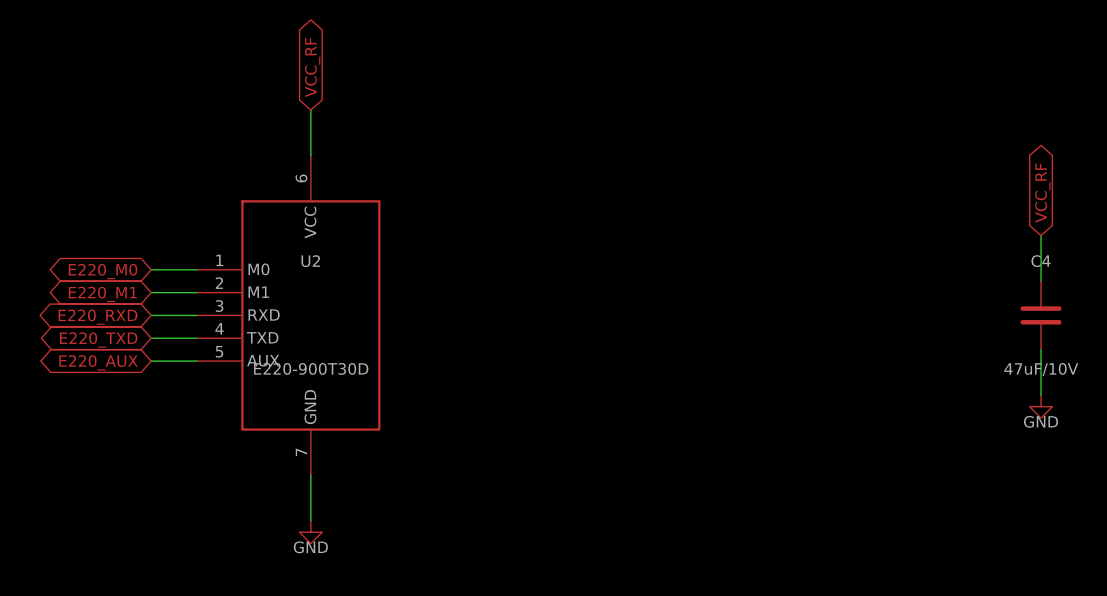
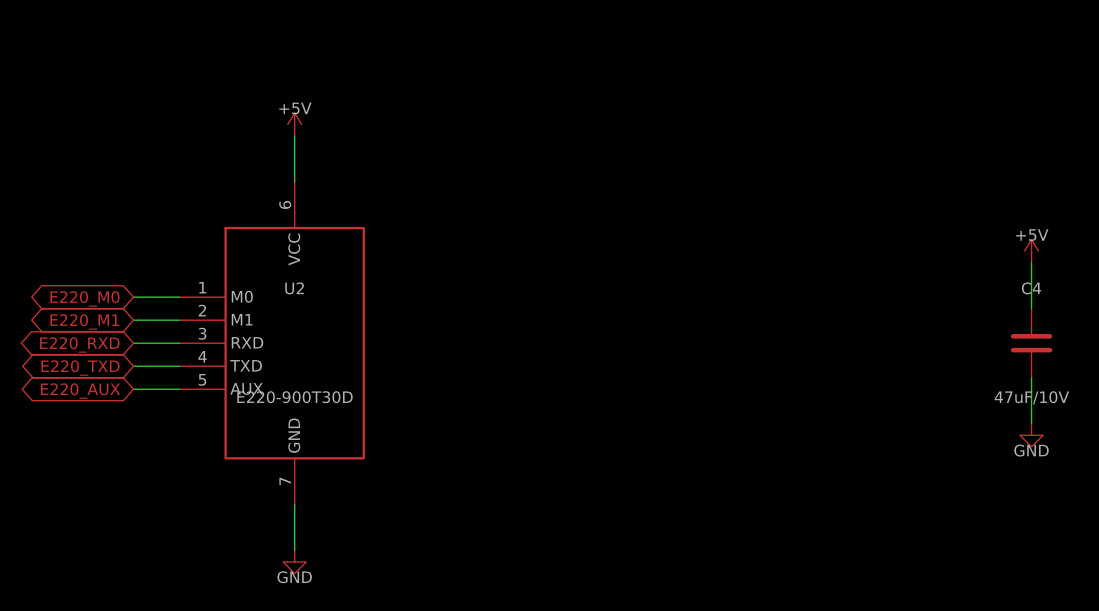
global label: VCC_RF (312, 67) -> none
power symbol: none -> +5V (294, 124)
global label: VCC_RF (1042, 193) -> none
power symbol: none -> +5V (1031, 251)

